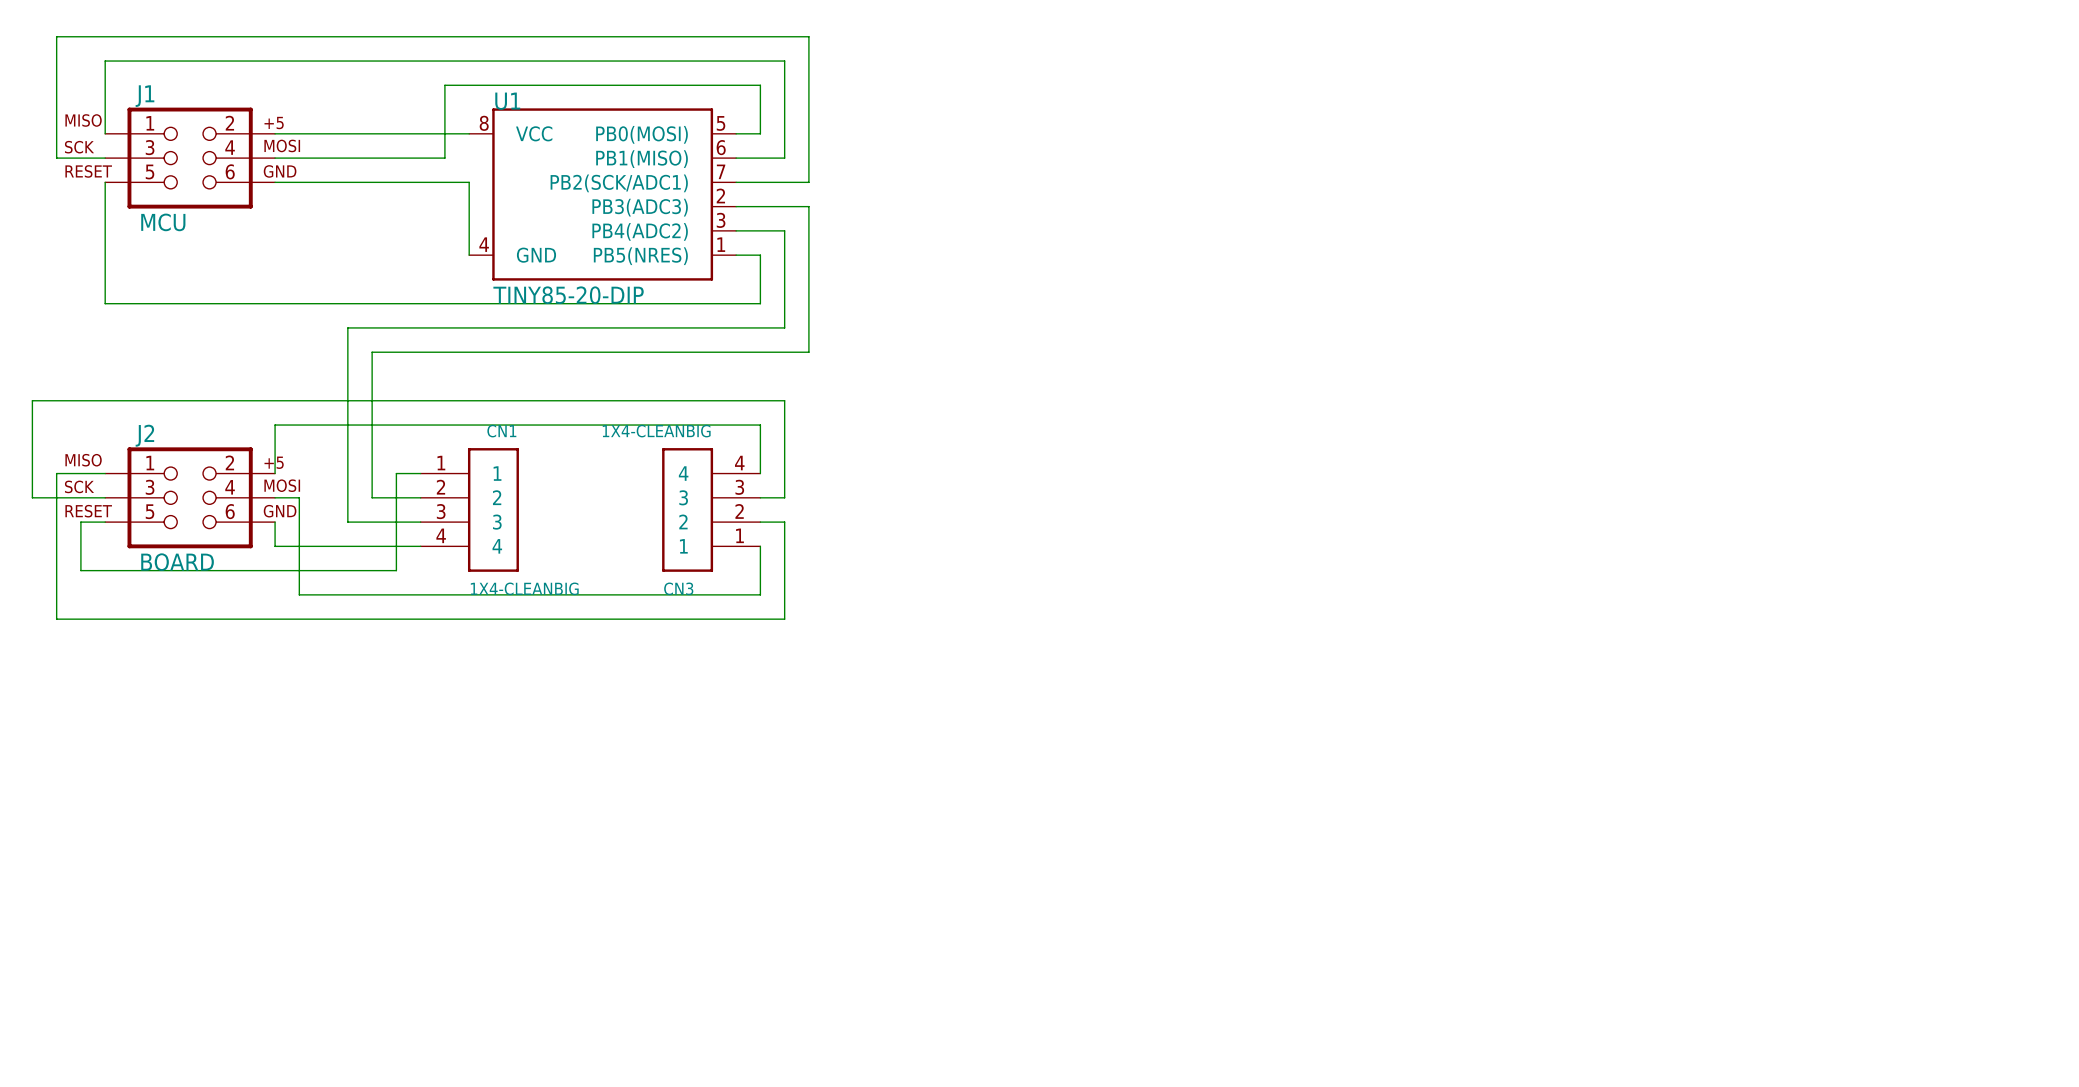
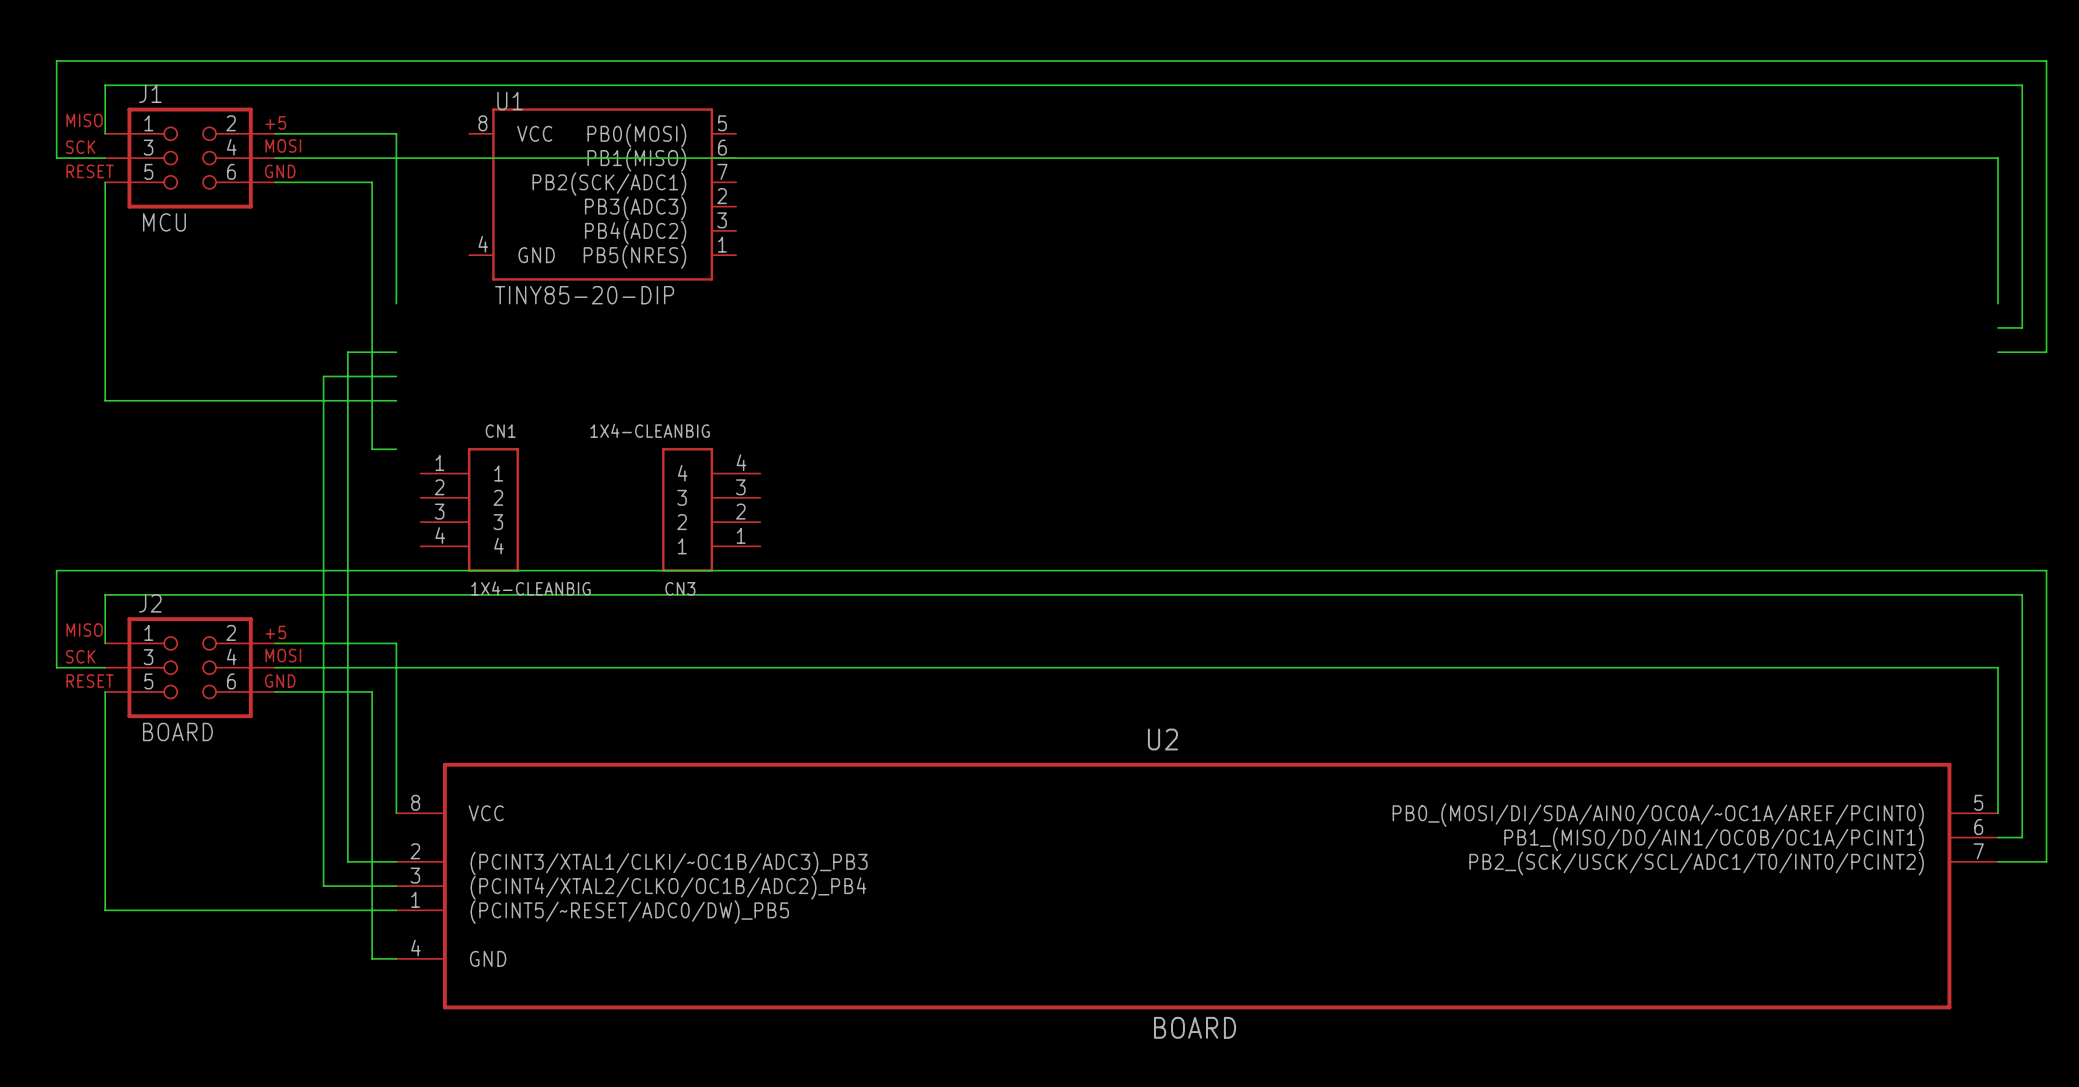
wire: (56, 61) (56, 36) (808, 36) (808, 182) (736, 182) -> none
wire: (105, 61) (105, 85) -> (105, 61) (56, 61)
wire: (784, 61) (784, 158) -> (784, 61) (2046, 61) (2046, 352) (1997, 352)
wire: none -> (105, 85) (444, 85)
wire: (444, 85) (444, 158) -> (736, 158) (444, 158)
wire: (760, 85) (760, 133) (736, 133) -> (760, 85) (2022, 85) (2022, 327) (1997, 327)
wire: (396, 133) (469, 133) -> (396, 133) (396, 303)
wire: none -> (784, 158) (1997, 158) (1997, 303)
wire: (372, 182) (469, 182) (469, 255) -> (372, 182) (372, 352) (347, 352)
wire: (736, 206) (808, 206) (808, 352) (396, 352) -> none
wire: (736, 230) (784, 230) (784, 327) (347, 327) (347, 352) -> none
wire: (736, 255) (760, 255) (760, 303) (105, 303) -> none
wire: none -> (396, 376) (323, 376) (323, 886) (396, 886)
wire: (105, 400) (32, 400) (32, 497) (105, 497) -> (105, 400) (105, 303)
wire: (396, 400) (784, 400) (784, 497) (760, 497) -> none
wire: (372, 449) (372, 497) (420, 497) -> (372, 449) (396, 449)
wire: (105, 473) (56, 473) (56, 570) -> none
wire: (275, 473) (275, 425) (760, 425) (760, 473) -> none
wire: (420, 473) (396, 473) (396, 570) -> (1997, 861) (2046, 861) (2046, 570) (396, 570)
J2 position: (190, 497) -> (190, 667)
wire: (275, 497) (299, 497) (299, 594) -> (105, 643) (105, 594) (299, 594)
wire: (105, 522) (80, 522) (80, 570) -> (56, 570) (80, 570)
wire: (275, 522) (275, 546) (420, 546) -> none
wire: (347, 522) (420, 522) -> (347, 522) (347, 861) (396, 861)
wire: (760, 522) (784, 522) (784, 619) (56, 619) -> (105, 667) (56, 667) (56, 619)
wire: (760, 546) (760, 594) -> (1997, 837) (2022, 837) (2022, 594) (760, 594)
wire: none -> (275, 643) (396, 643) (396, 813)
wire: none -> (275, 667) (1997, 667) (1997, 813)
wire: none -> (105, 691) (105, 910) (396, 910)
wire: none -> (275, 691) (372, 691) (372, 958) (396, 958)
U2: none -> BOARD (1197, 886)

